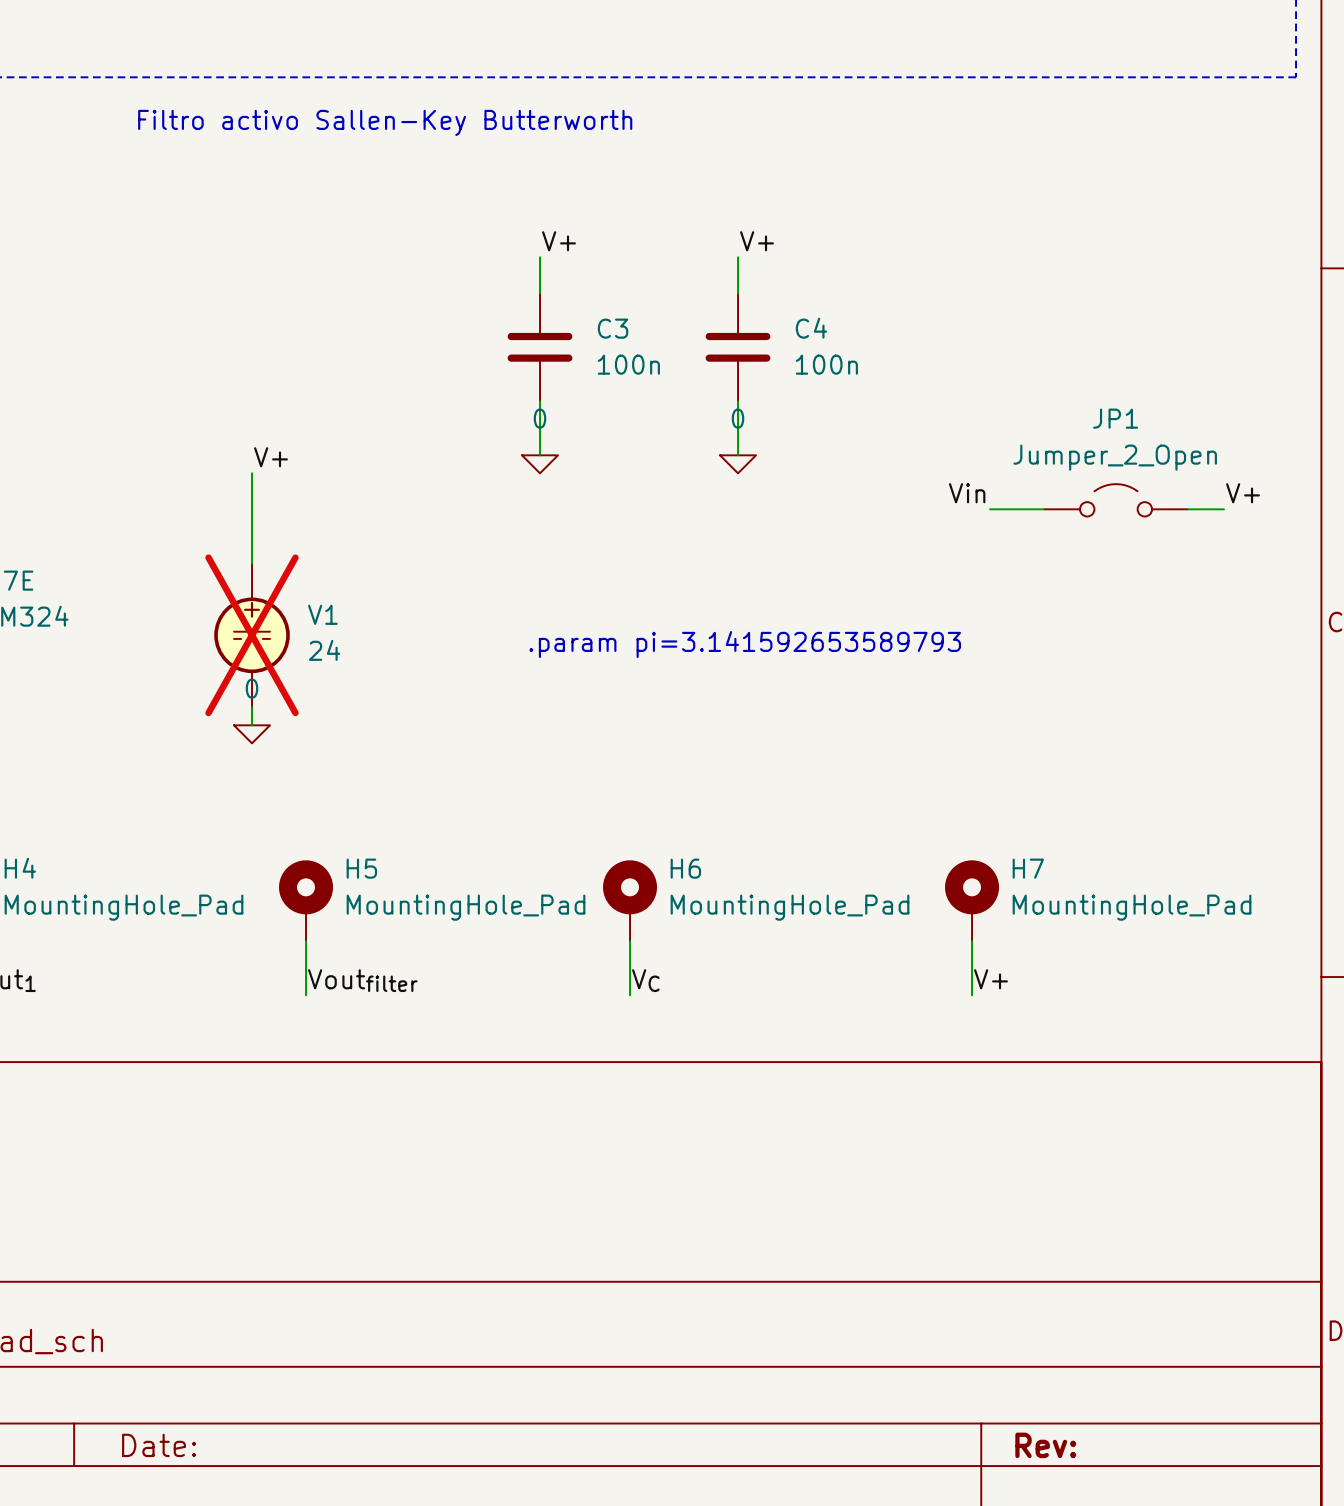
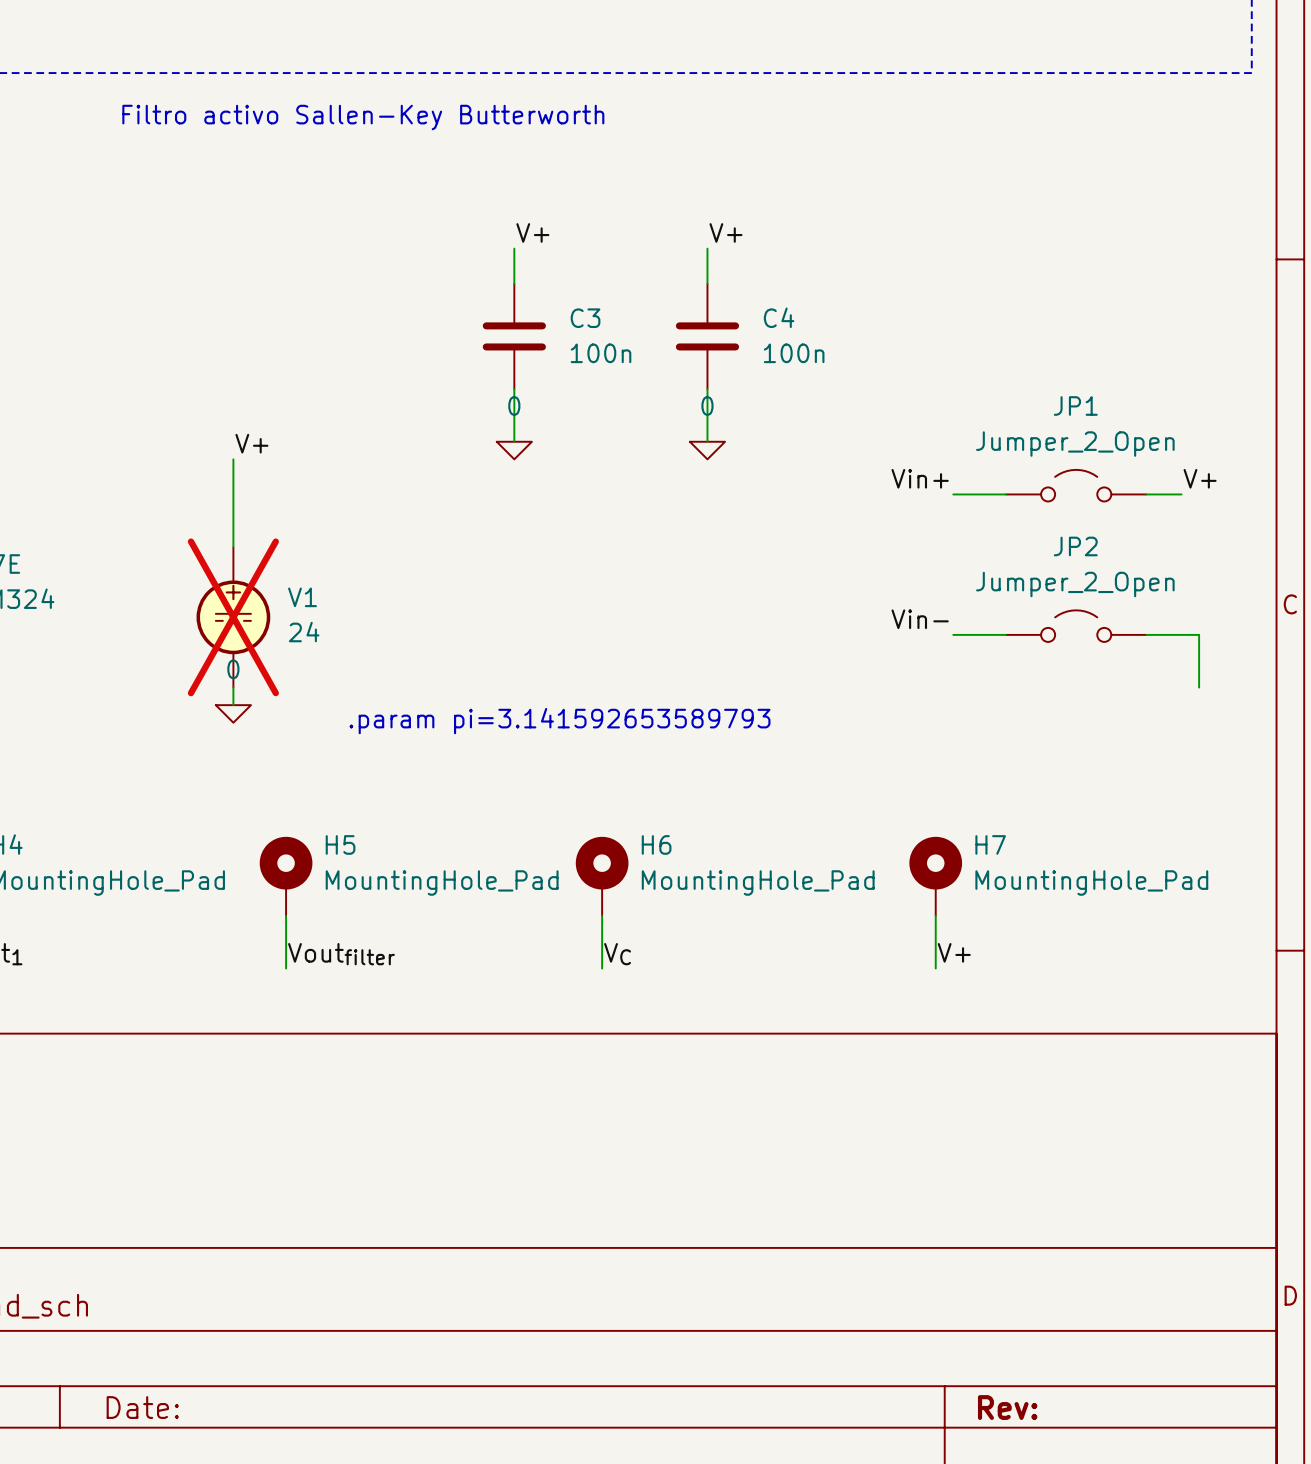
label: Vin (967, 493) -> Vin+ (920, 478)
label: none -> Vin- (920, 619)
text position: .param pi=3.141592653589793 (745, 644) -> .param pi=3.141592653589793 (559, 721)
JP2: none -> Jumper_2_Open (1076, 626)
wire: none -> (953, 634) (1005, 634)
wire: none -> (1146, 634) (1199, 634) (1199, 687)

